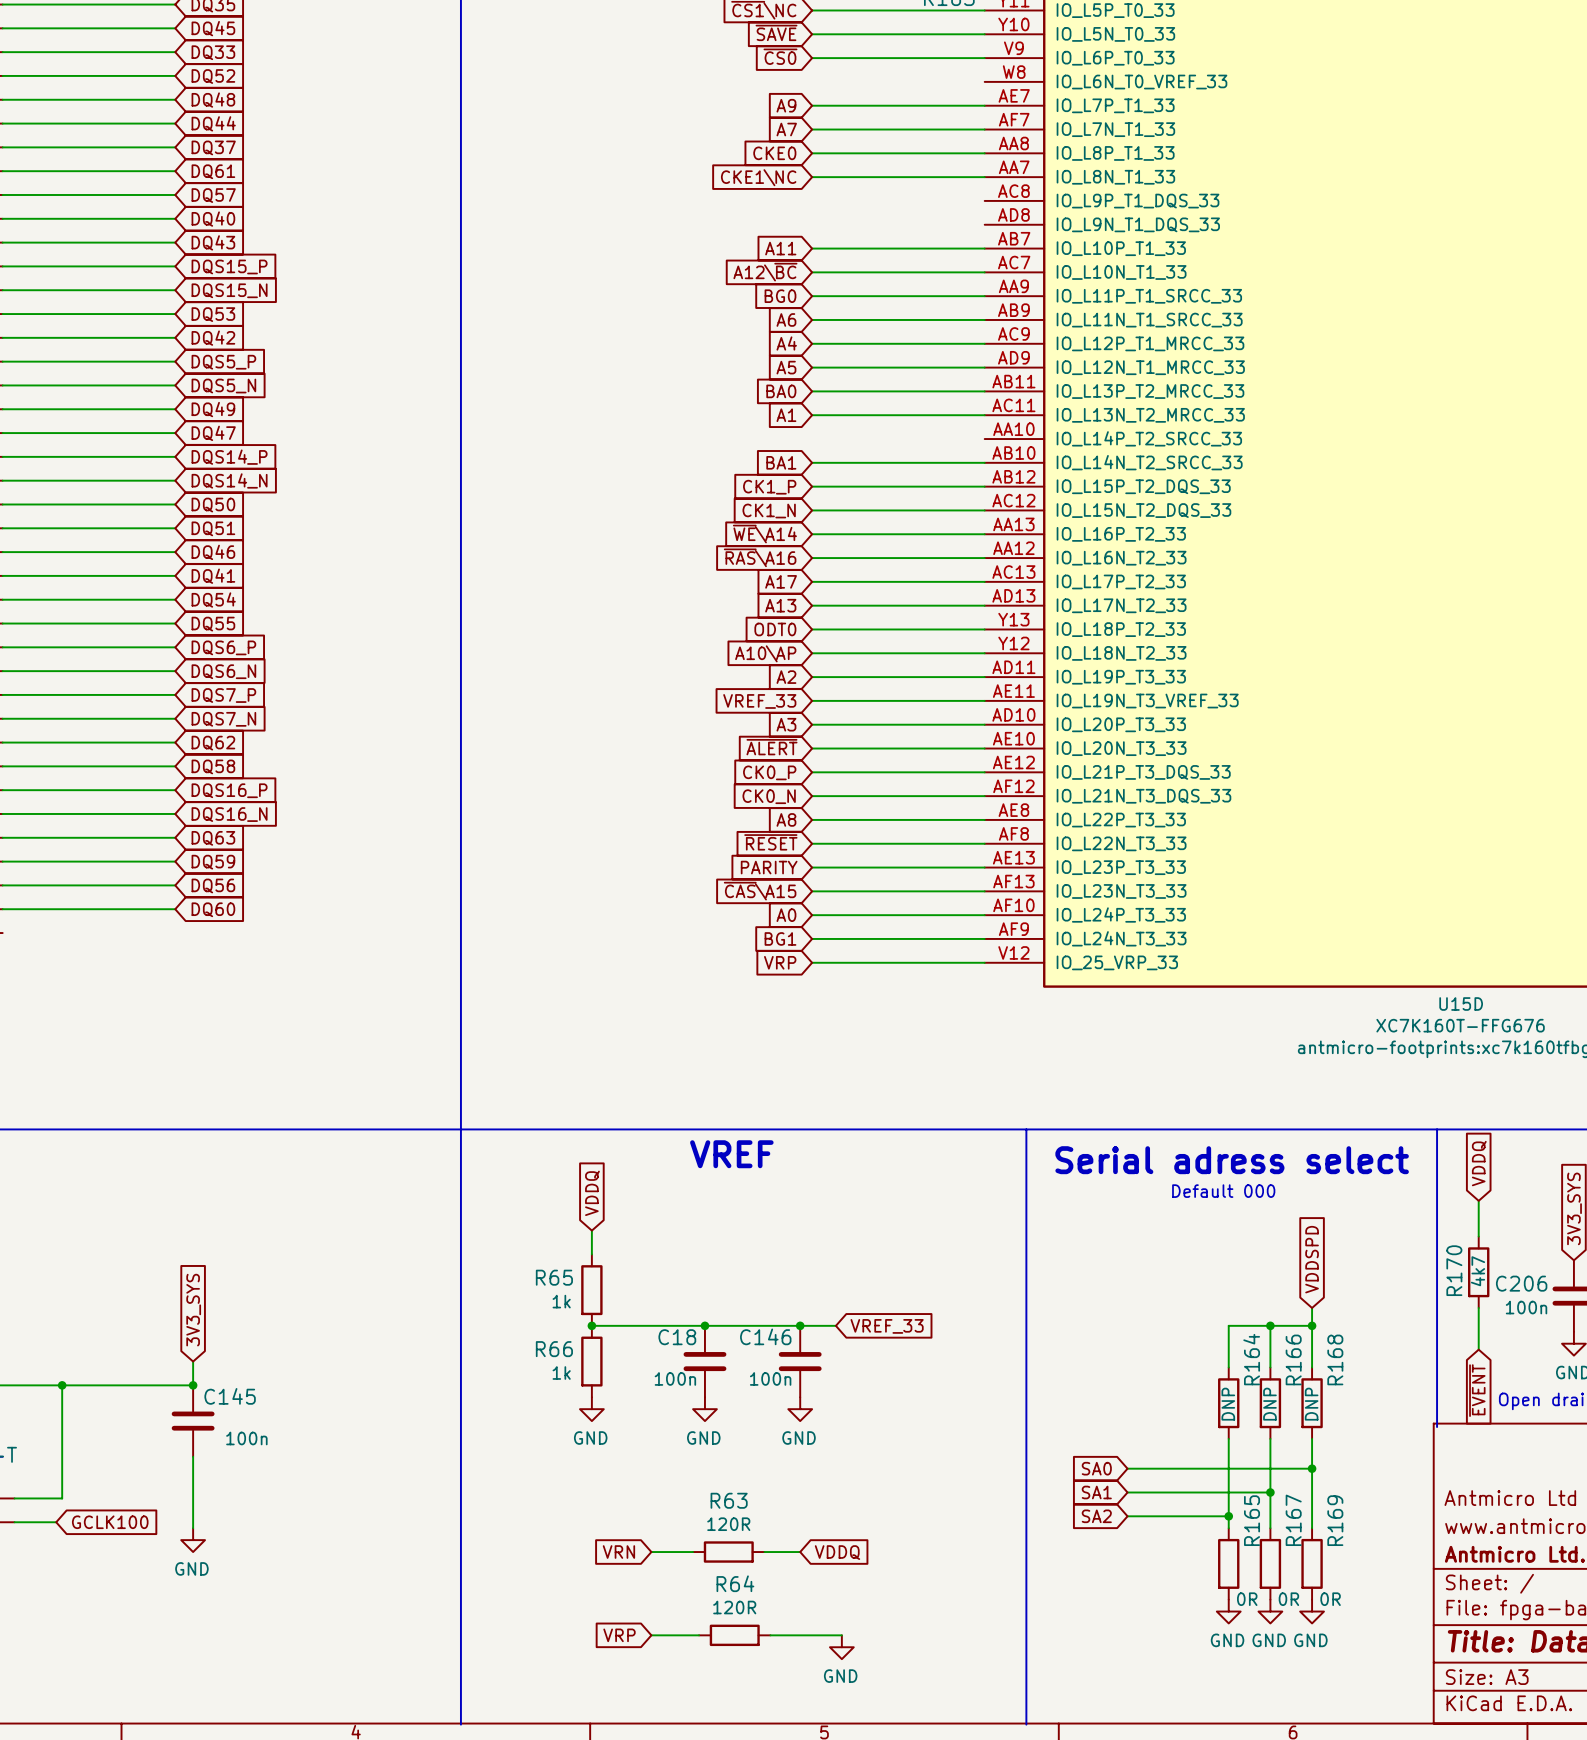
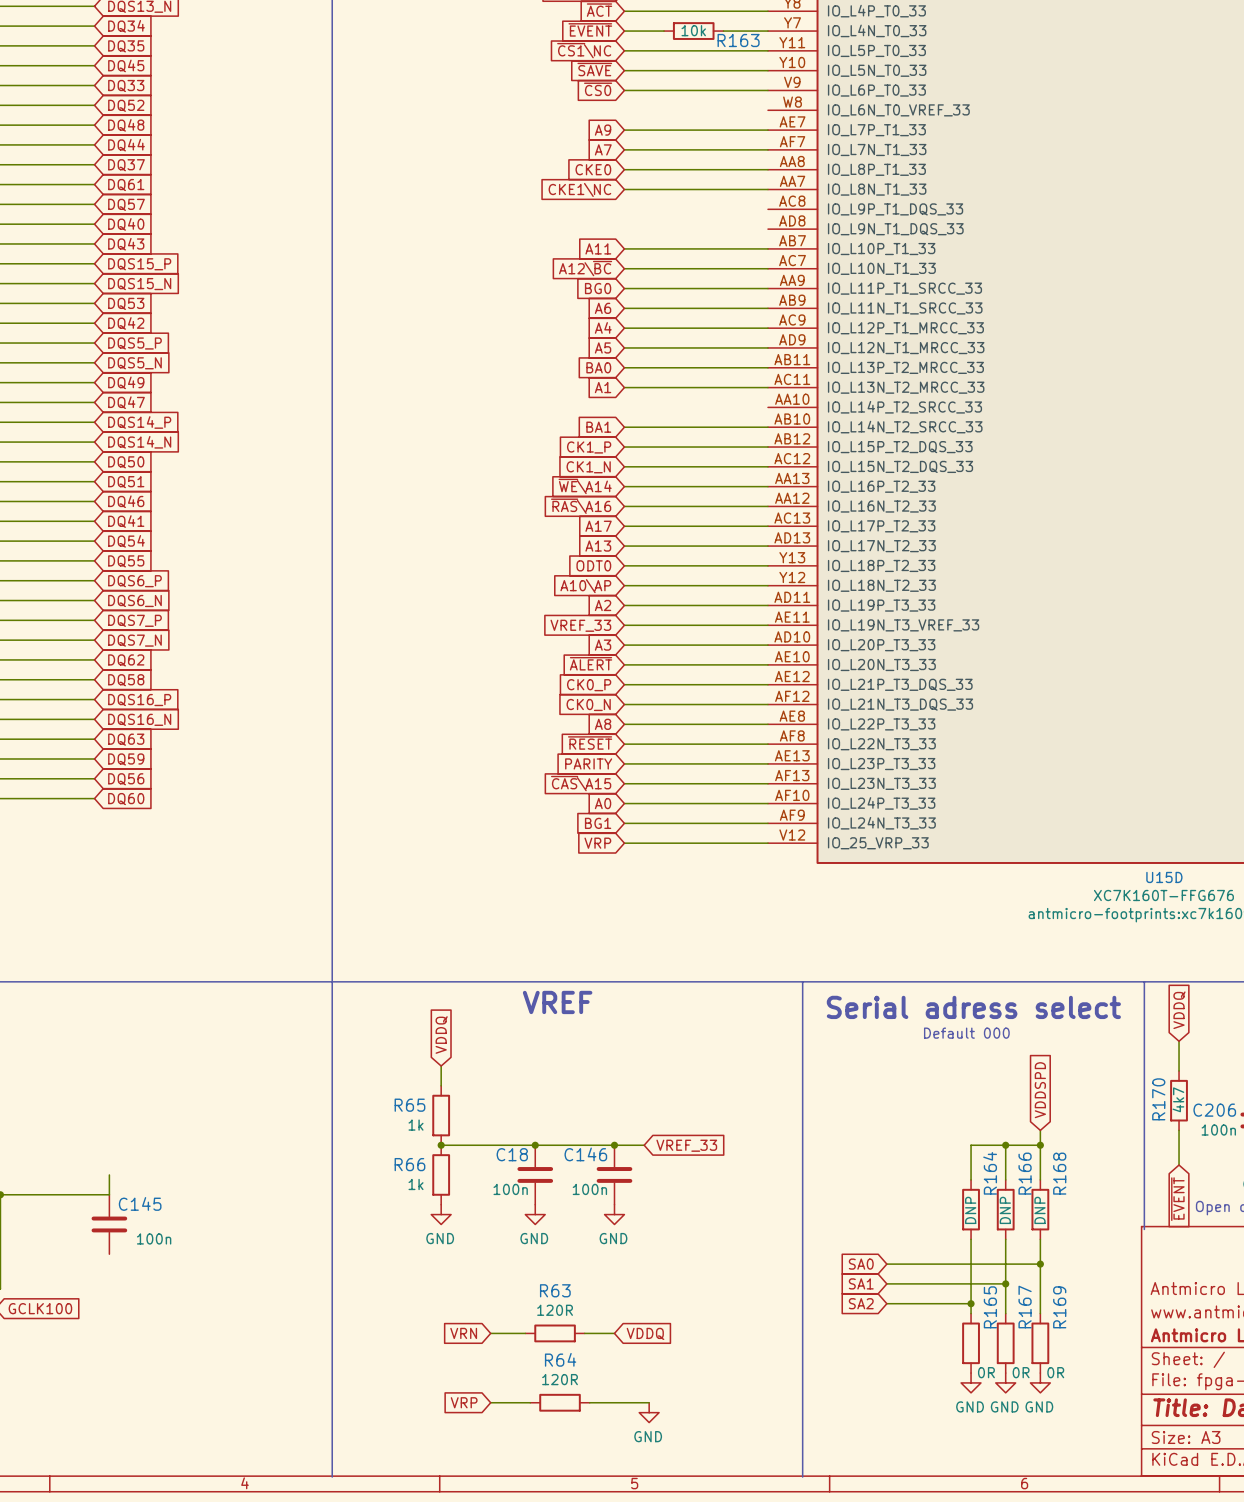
global label: 3V3_SYS (193, 1310) -> none
junction: (193, 1385) -> none
wire: (193, 1456) (193, 1528) -> none
power symbol: GND (193, 1540) -> none

